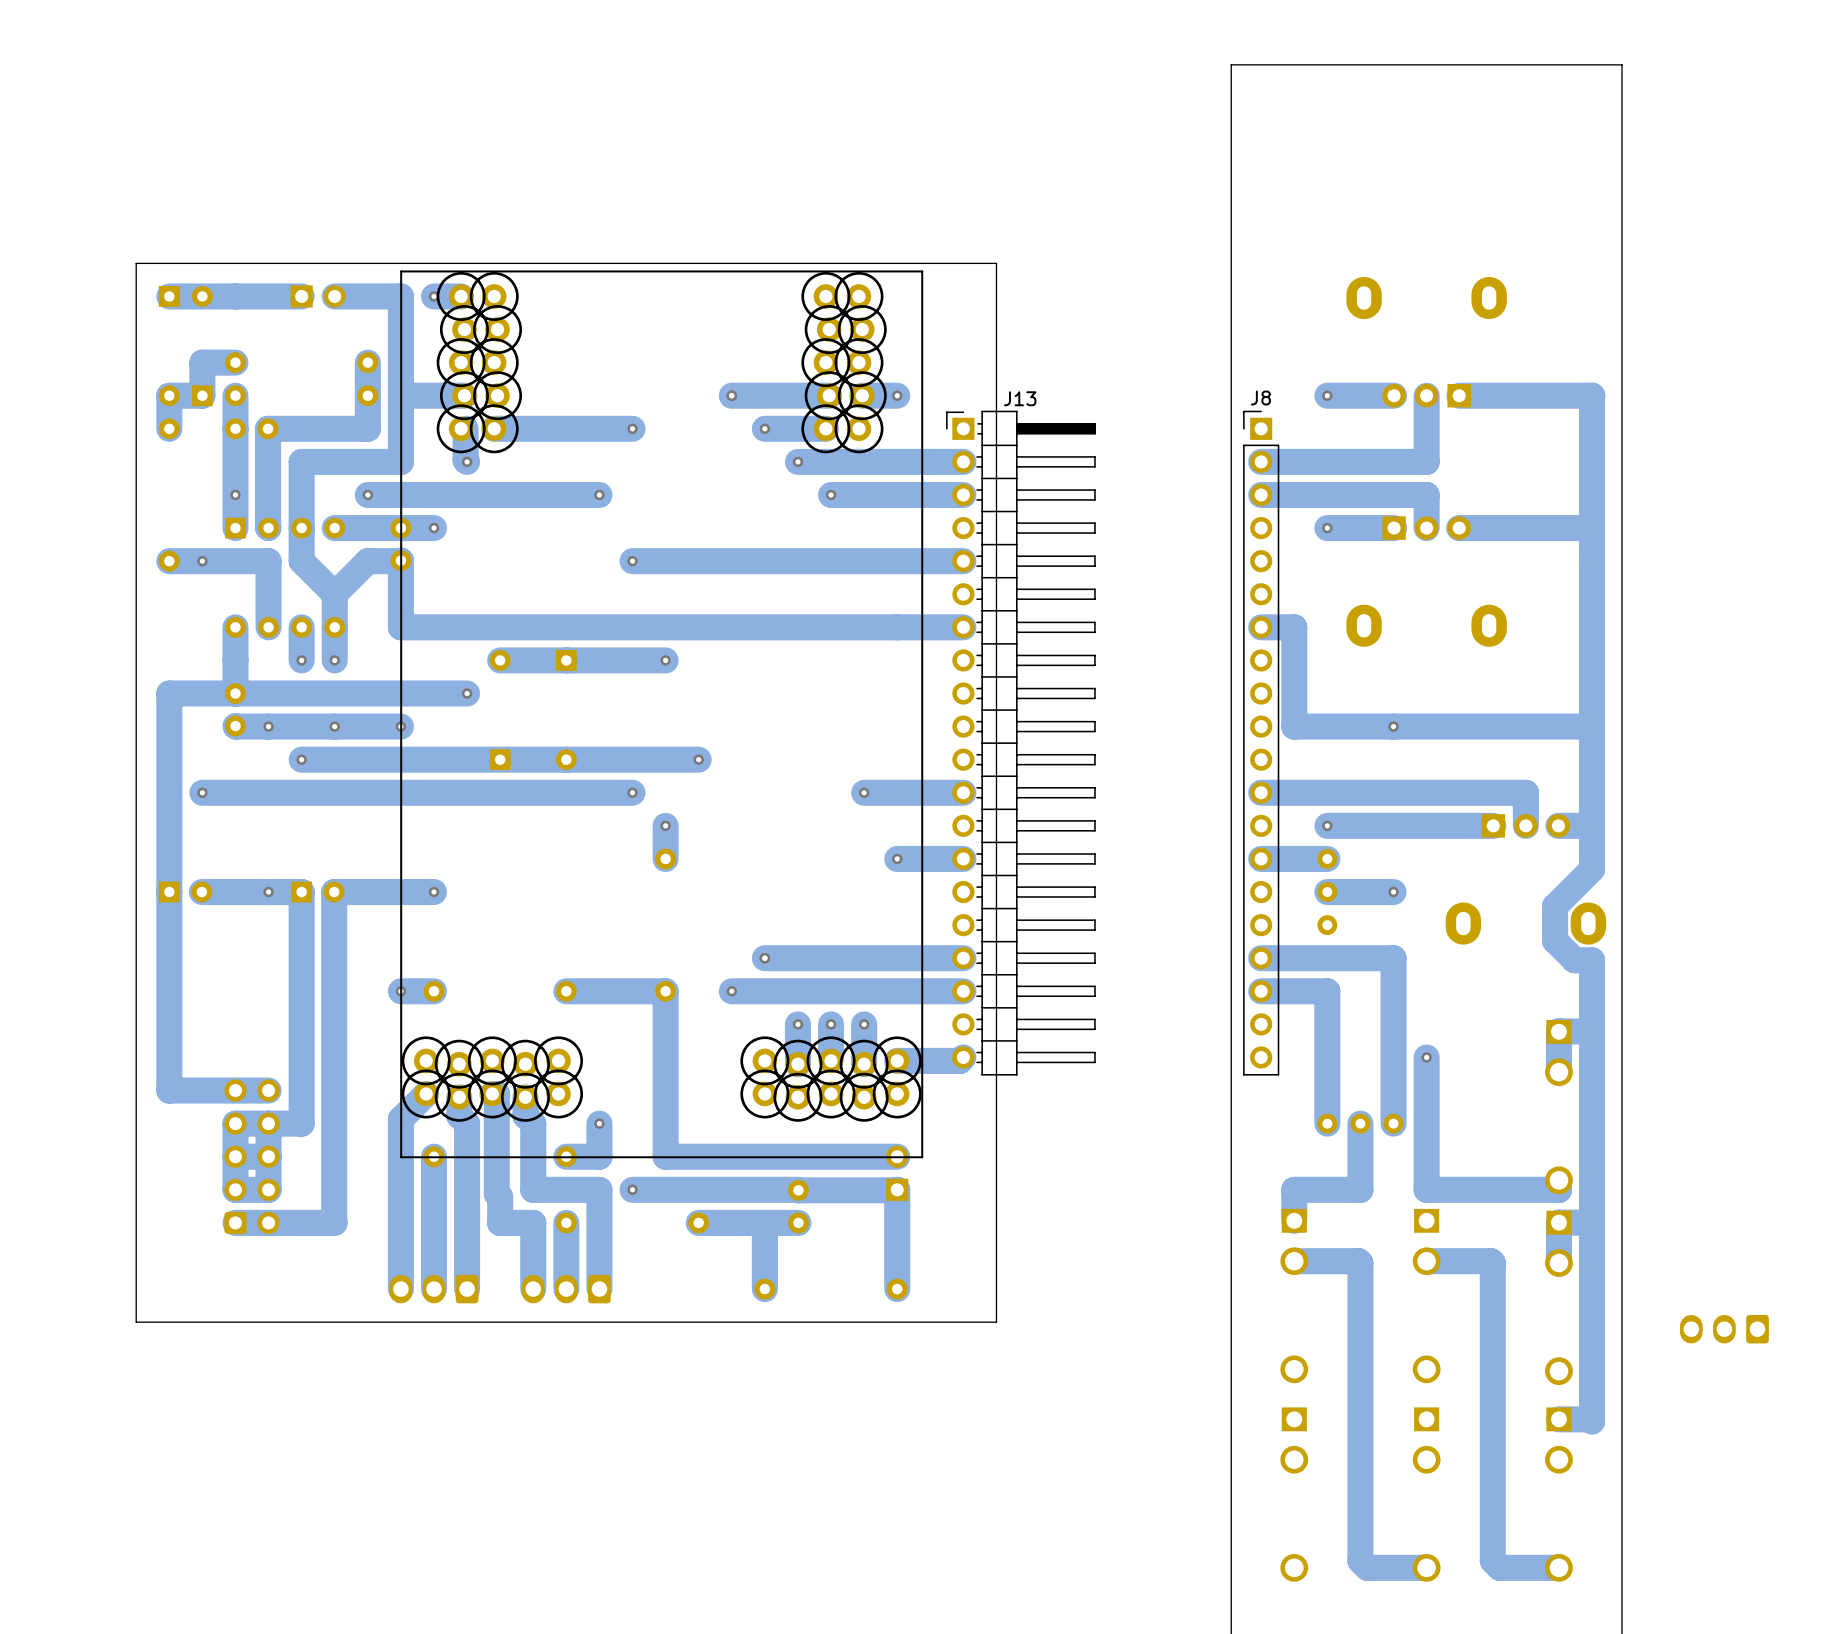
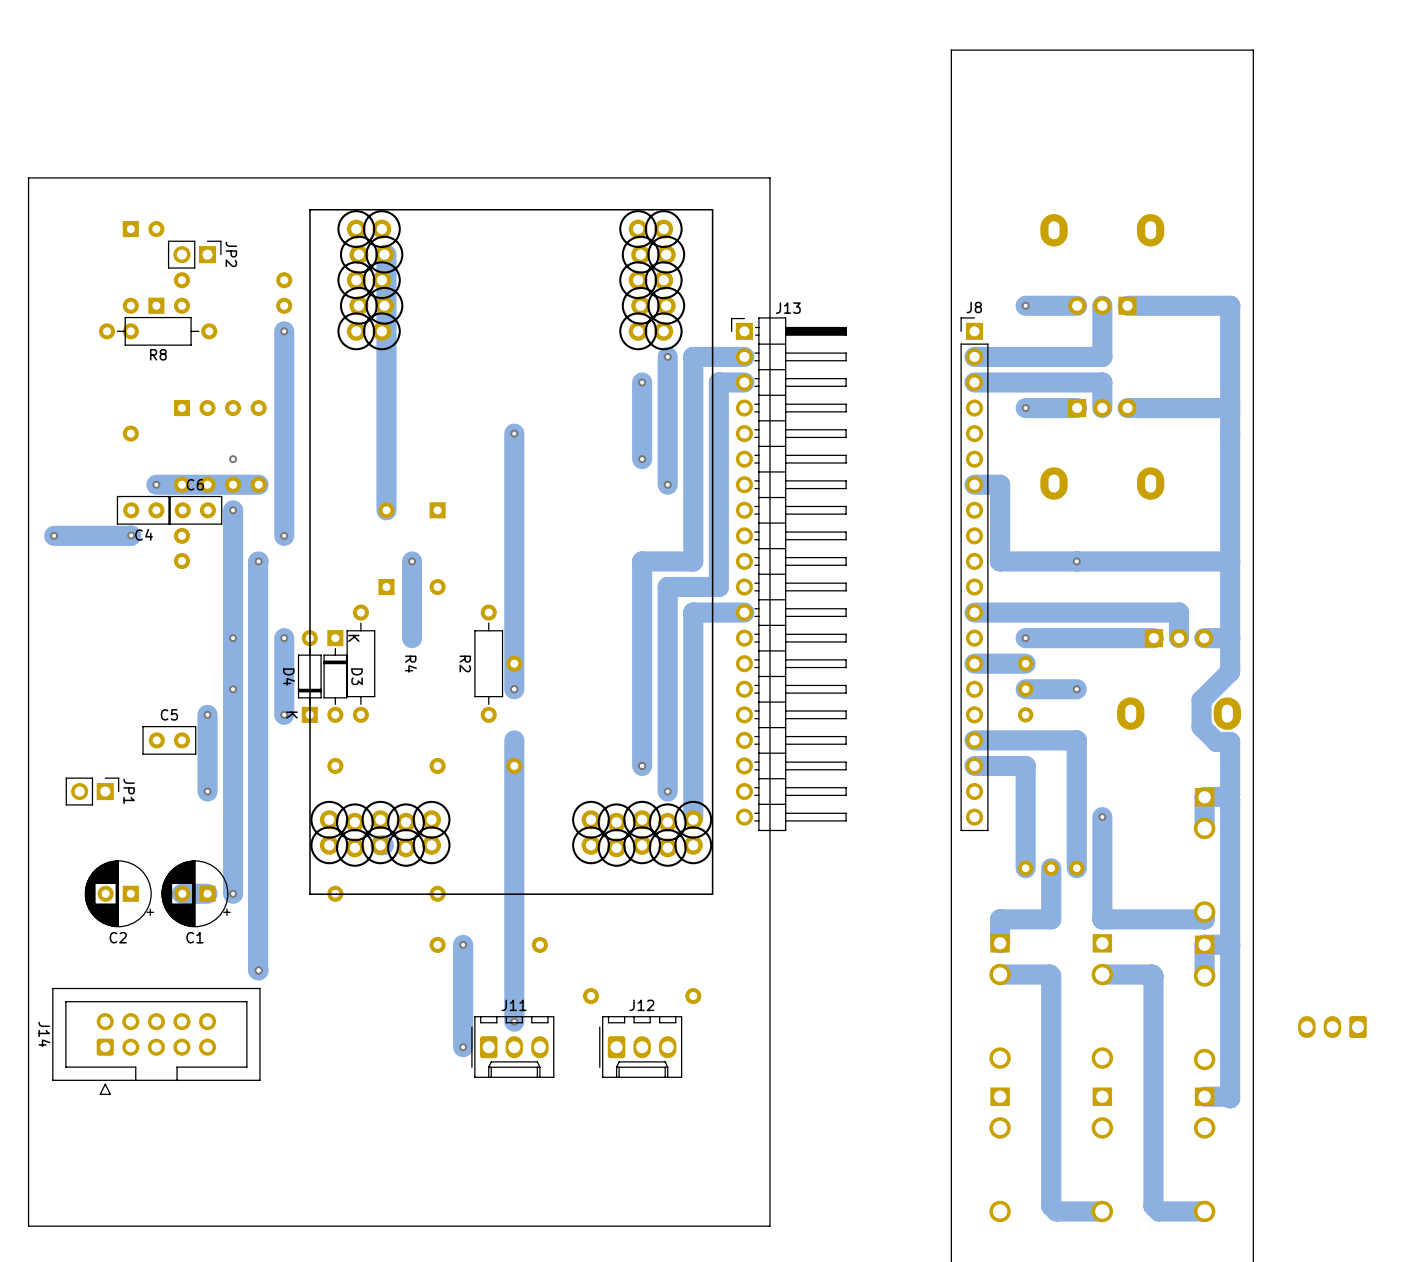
board edge: (996, 263) (136, 263) (136, 1322) (996, 1322) -> (769, 203) (769, 177) (28, 177) (28, 1226) (769, 1226) (769, 1021)
track: (301, 296) (169, 296) -> none
part: (318, 296) -> none
track: (334, 296) (400, 296) (400, 461) (301, 461) (301, 561) (334, 594) -> none
via: (434, 296) -> none
track: (461, 296) (434, 296) -> none
JP2: none -> (194, 254)
track: (235, 362) (202, 362) (202, 395) (169, 395) (169, 428) -> none
track: (367, 362) (367, 428) (268, 428) (268, 528) -> none
track: (235, 395) (235, 528) -> none
track: (464, 395) (400, 395) -> none
via: (731, 395) -> none
track: (829, 395) (731, 395) -> none
track: (897, 395) (862, 395) -> none
via: (897, 395) -> none
R8: none -> (158, 331)
C6 side: top (251, 428) -> bottom (195, 510)
track: none -> (284, 331) (284, 535)
via: none -> (284, 331)
track: (465, 428) (467, 461) -> none
track: (632, 428) (494, 428) -> none
via: (632, 428) -> none
via: (764, 428) -> none
track: (825, 428) (764, 428) -> none
via: (467, 461) -> none
via: (797, 461) -> none
track: none -> (667, 356) (667, 484)
via: none -> (667, 356)
track: (897, 461) (797, 461) -> (693, 356) (693, 561) (642, 561) (642, 765)
via: (235, 494) -> none
via: (367, 494) -> none
track: (599, 494) (367, 494) -> none
via: (599, 494) -> none
track: (930, 494) (831, 494) -> (642, 459) (642, 382)
track: (434, 528) (334, 528) -> none
via: (434, 528) -> none
C4 side: top (400, 544) -> bottom (143, 510)
track: (400, 560) (400, 627) (963, 627) -> none
track: (169, 561) (268, 561) (268, 627) -> none
via: (202, 561) -> none
track: (400, 561) (367, 561) (334, 594) -> none
via position: (632, 561) -> (514, 433)
track: none -> (514, 433) (514, 638)
track: (963, 561) (632, 561) -> none
via: none -> (233, 459)
track: (334, 594) (334, 660) -> none
via: none -> (642, 459)
via: none -> (156, 484)
track: (235, 627) (235, 693) -> none
track: (301, 627) (301, 660) -> none
track: none -> (258, 484) (156, 484)
via: none -> (667, 484)
via: (334, 660) -> none
track: (665, 660) (500, 660) -> (386, 254) (386, 510)
via: (665, 660) -> none
track: none -> (131, 535) (54, 535)
via: none -> (131, 535)
via: none -> (54, 535)
via: none -> (284, 535)
track: (467, 693) (169, 693) (169, 1090) (268, 1090) -> none
via: (467, 693) -> none
track: (235, 726) (400, 726) -> none
via: (268, 726) -> none
track: none -> (258, 561) (258, 970)
via: (400, 726) -> none
track: none -> (412, 561) (412, 638)
via: none -> (412, 561)
via: (301, 759) -> none
track: (698, 759) (301, 759) -> none
via: (698, 759) -> none
via: (202, 792) -> none
track: (632, 792) (202, 792) -> none
via: (632, 792) -> none
via: (864, 792) -> none
track: (897, 792) (864, 792) -> (693, 612) (693, 817)
via: none -> (233, 638)
track: none -> (284, 638) (284, 714)
via: none -> (284, 638)
via: (665, 825) -> none
R4: none -> (360, 663)
R2: none -> (488, 663)
via: (897, 858) -> none
track: (963, 858) (897, 858) -> none
D4: none -> (309, 676)
D3: none -> (335, 676)
C1 side: top (185, 892) -> bottom (196, 893)
via: (268, 892) -> none
track: (301, 892) (201, 892) -> (233, 689) (233, 510)
via: none -> (233, 689)
C2 side: top (317, 892) -> bottom (119, 893)
track: (434, 892) (334, 892) (334, 1222) -> none
via: (434, 892) -> none
via: none -> (514, 689)
track: none -> (207, 714) (207, 791)
via: none -> (207, 714)
via: none -> (284, 714)
C5: none -> (169, 740)
via: (764, 958) -> none
track: (963, 958) (764, 958) -> none
via: (400, 991) -> none
track: (434, 991) (400, 991) -> none
track: (665, 991) (566, 991) -> (514, 765) (514, 740)
via: (731, 991) -> none
via: none -> (642, 765)
track: (963, 991) (731, 991) -> none
JP1: none -> (92, 791)
via: none -> (207, 791)
track: (797, 1024) (797, 1064) -> none
via: (797, 1024) -> none
track: (831, 1024) (831, 1057) -> (514, 663) (514, 689)
via: (831, 1024) -> none
track: (864, 1024) (864, 1064) -> (667, 791) (667, 587) (718, 587) (718, 382)
track: (963, 1057) (959, 1060) (897, 1060) -> none
track: (426, 1093) (400, 1119) (400, 1289) -> none
track: (496, 1094) (496, 1193) (500, 1197) (500, 1222) (533, 1222) (533, 1289) -> none
track: (459, 1097) (459, 1115) (467, 1123) (467, 1289) -> none
track: (525, 1097) (525, 1115) (533, 1123) (533, 1189) (599, 1189) (599, 1222) -> none
track: (301, 1123) (235, 1123) (235, 1189) (268, 1189) (268, 1123) -> (233, 868) (233, 893)
track: (599, 1123) (599, 1156) (566, 1156) -> none
via: (599, 1123) -> none
J14 side: top (252, 1156) -> bottom (156, 1041)
via: none -> (233, 893)
track: (434, 1156) (434, 1289) -> none
track: (897, 1156) (665, 1156) -> (514, 1021) (514, 893)
part: (897, 1173) -> none
track: (632, 1189) (897, 1189) (897, 1289) -> none
via position: (632, 1189) -> (463, 944)
part: (798, 1206) -> none
track: (334, 1222) (235, 1222) -> none
track: (566, 1222) (566, 1289) -> (463, 996) (463, 1047)
track: (764, 1222) (764, 1289) -> none
track: (798, 1222) (698, 1222) -> none
via: none -> (258, 970)
part: (434, 1289) -> none
J11 side: top (566, 1289) -> bottom (512, 1046)
via: none -> (514, 1021)
J12: none -> (640, 1046)
via: none -> (463, 1047)

